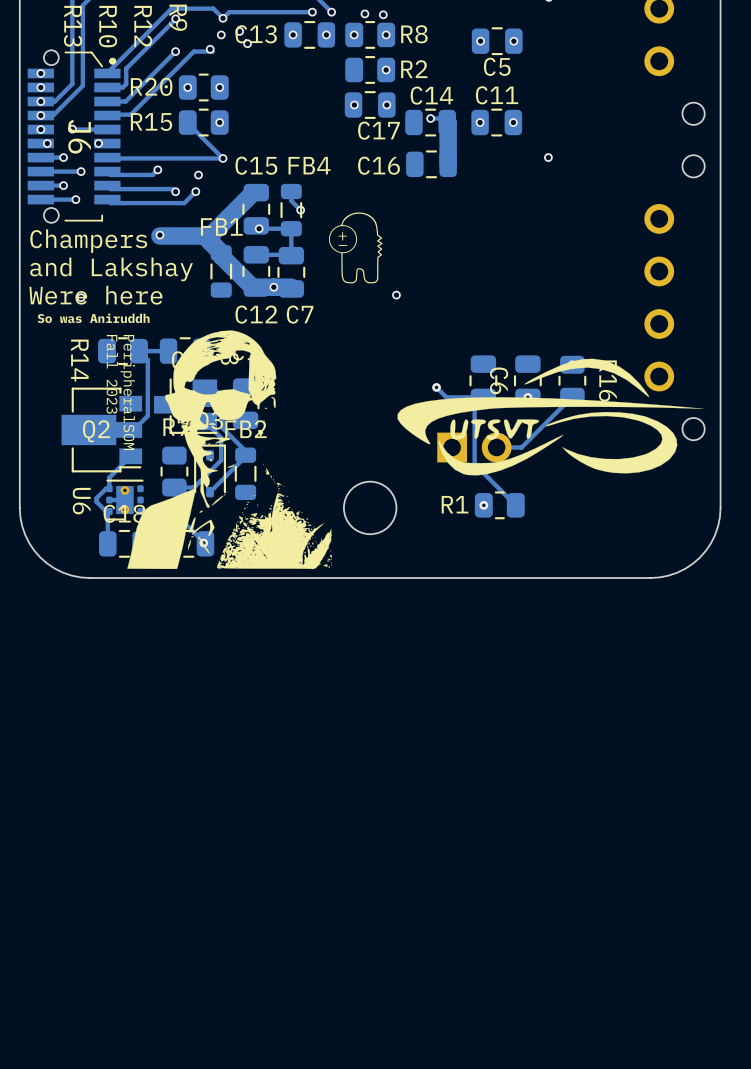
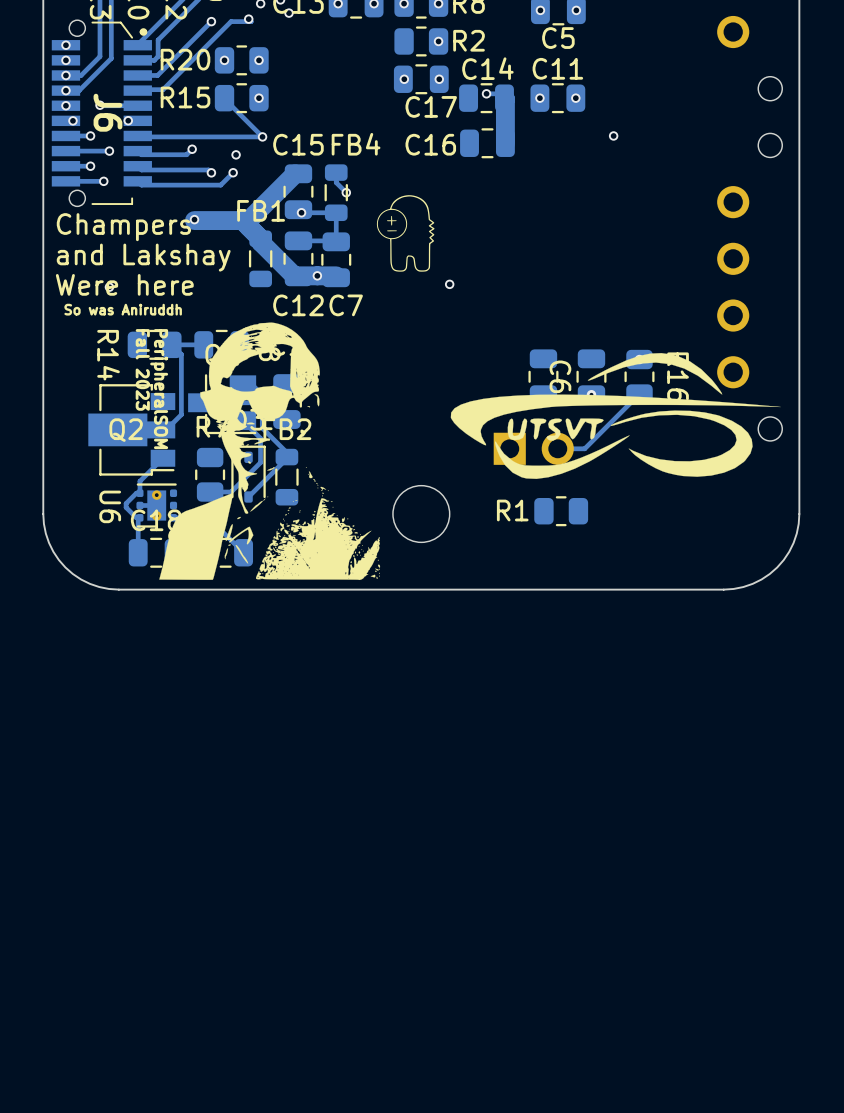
track: (436, 387) (446, 397) (483, 397) (474, 406) (474, 464) (515, 505) -> none
via: (436, 387) -> none
via: (483, 505) -> none
via: (203, 542) -> none

